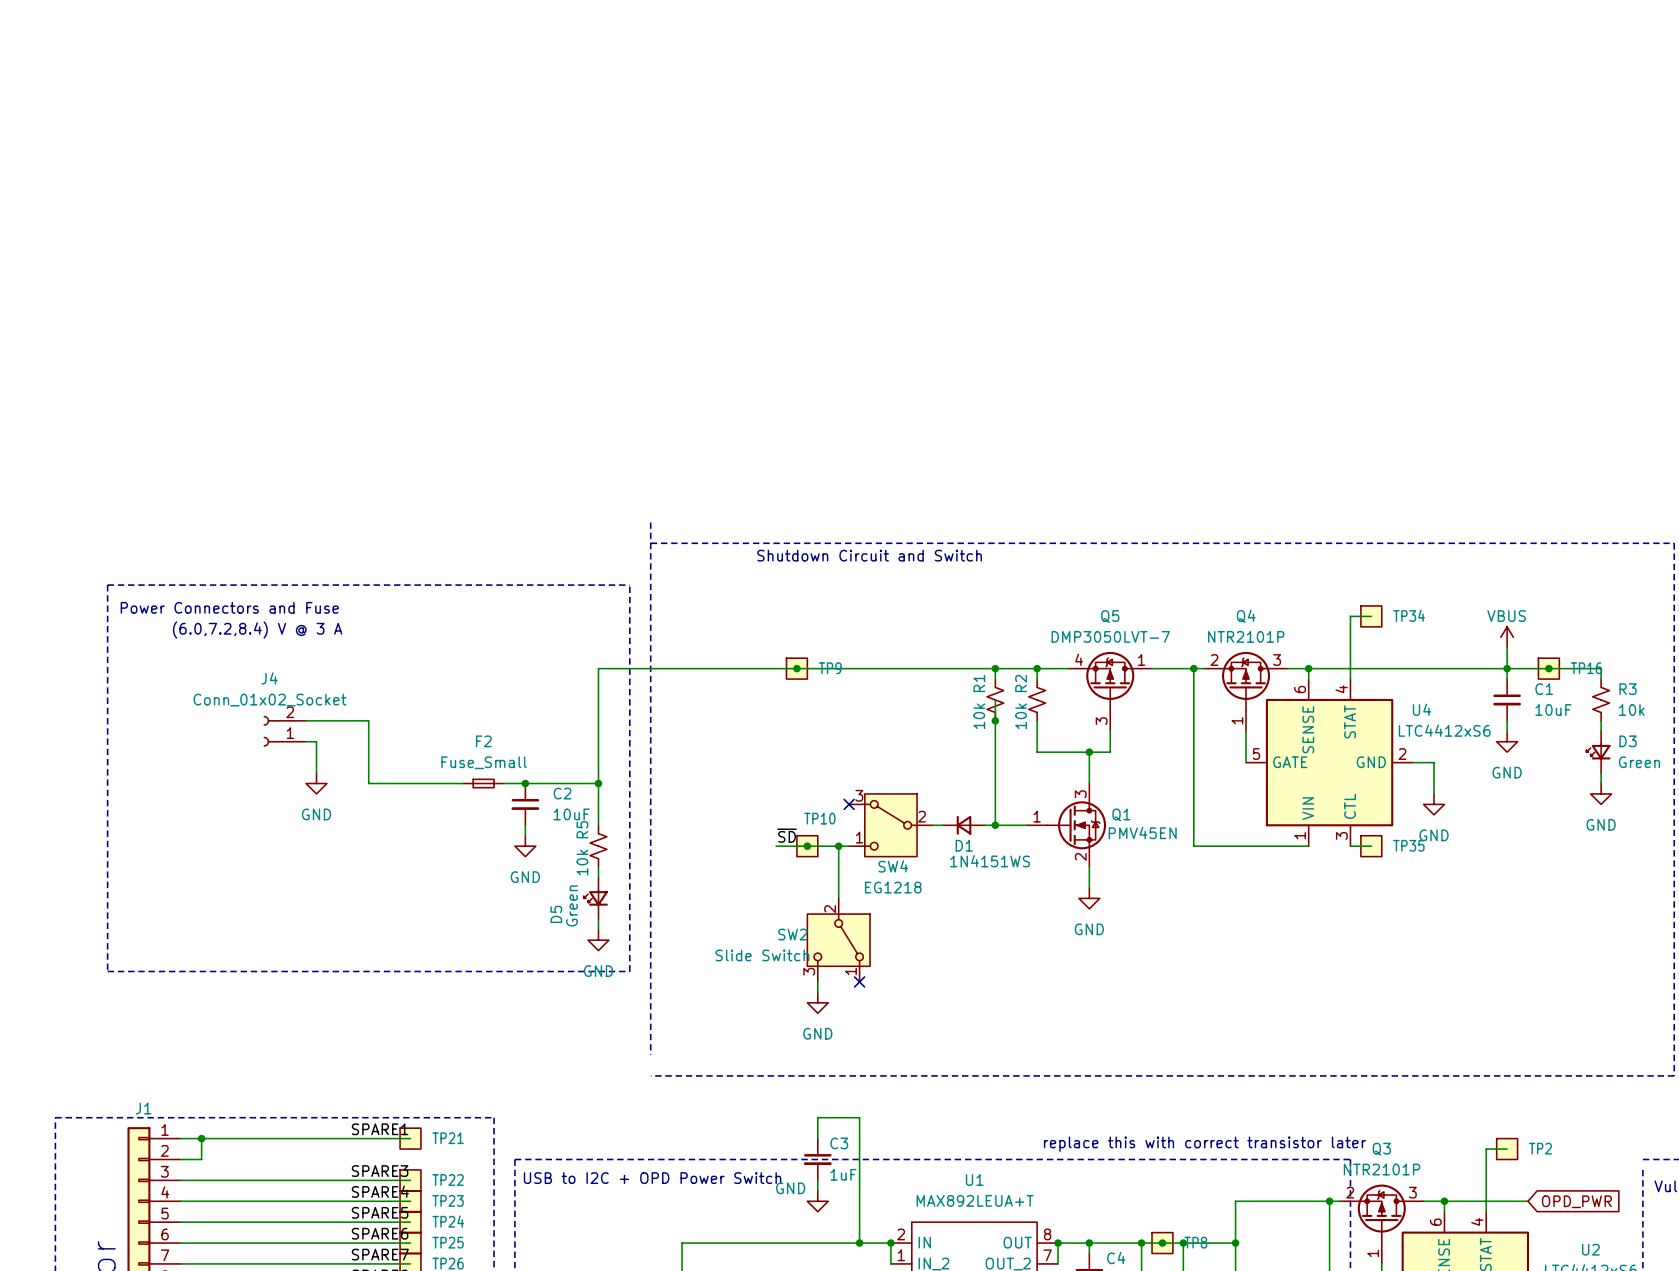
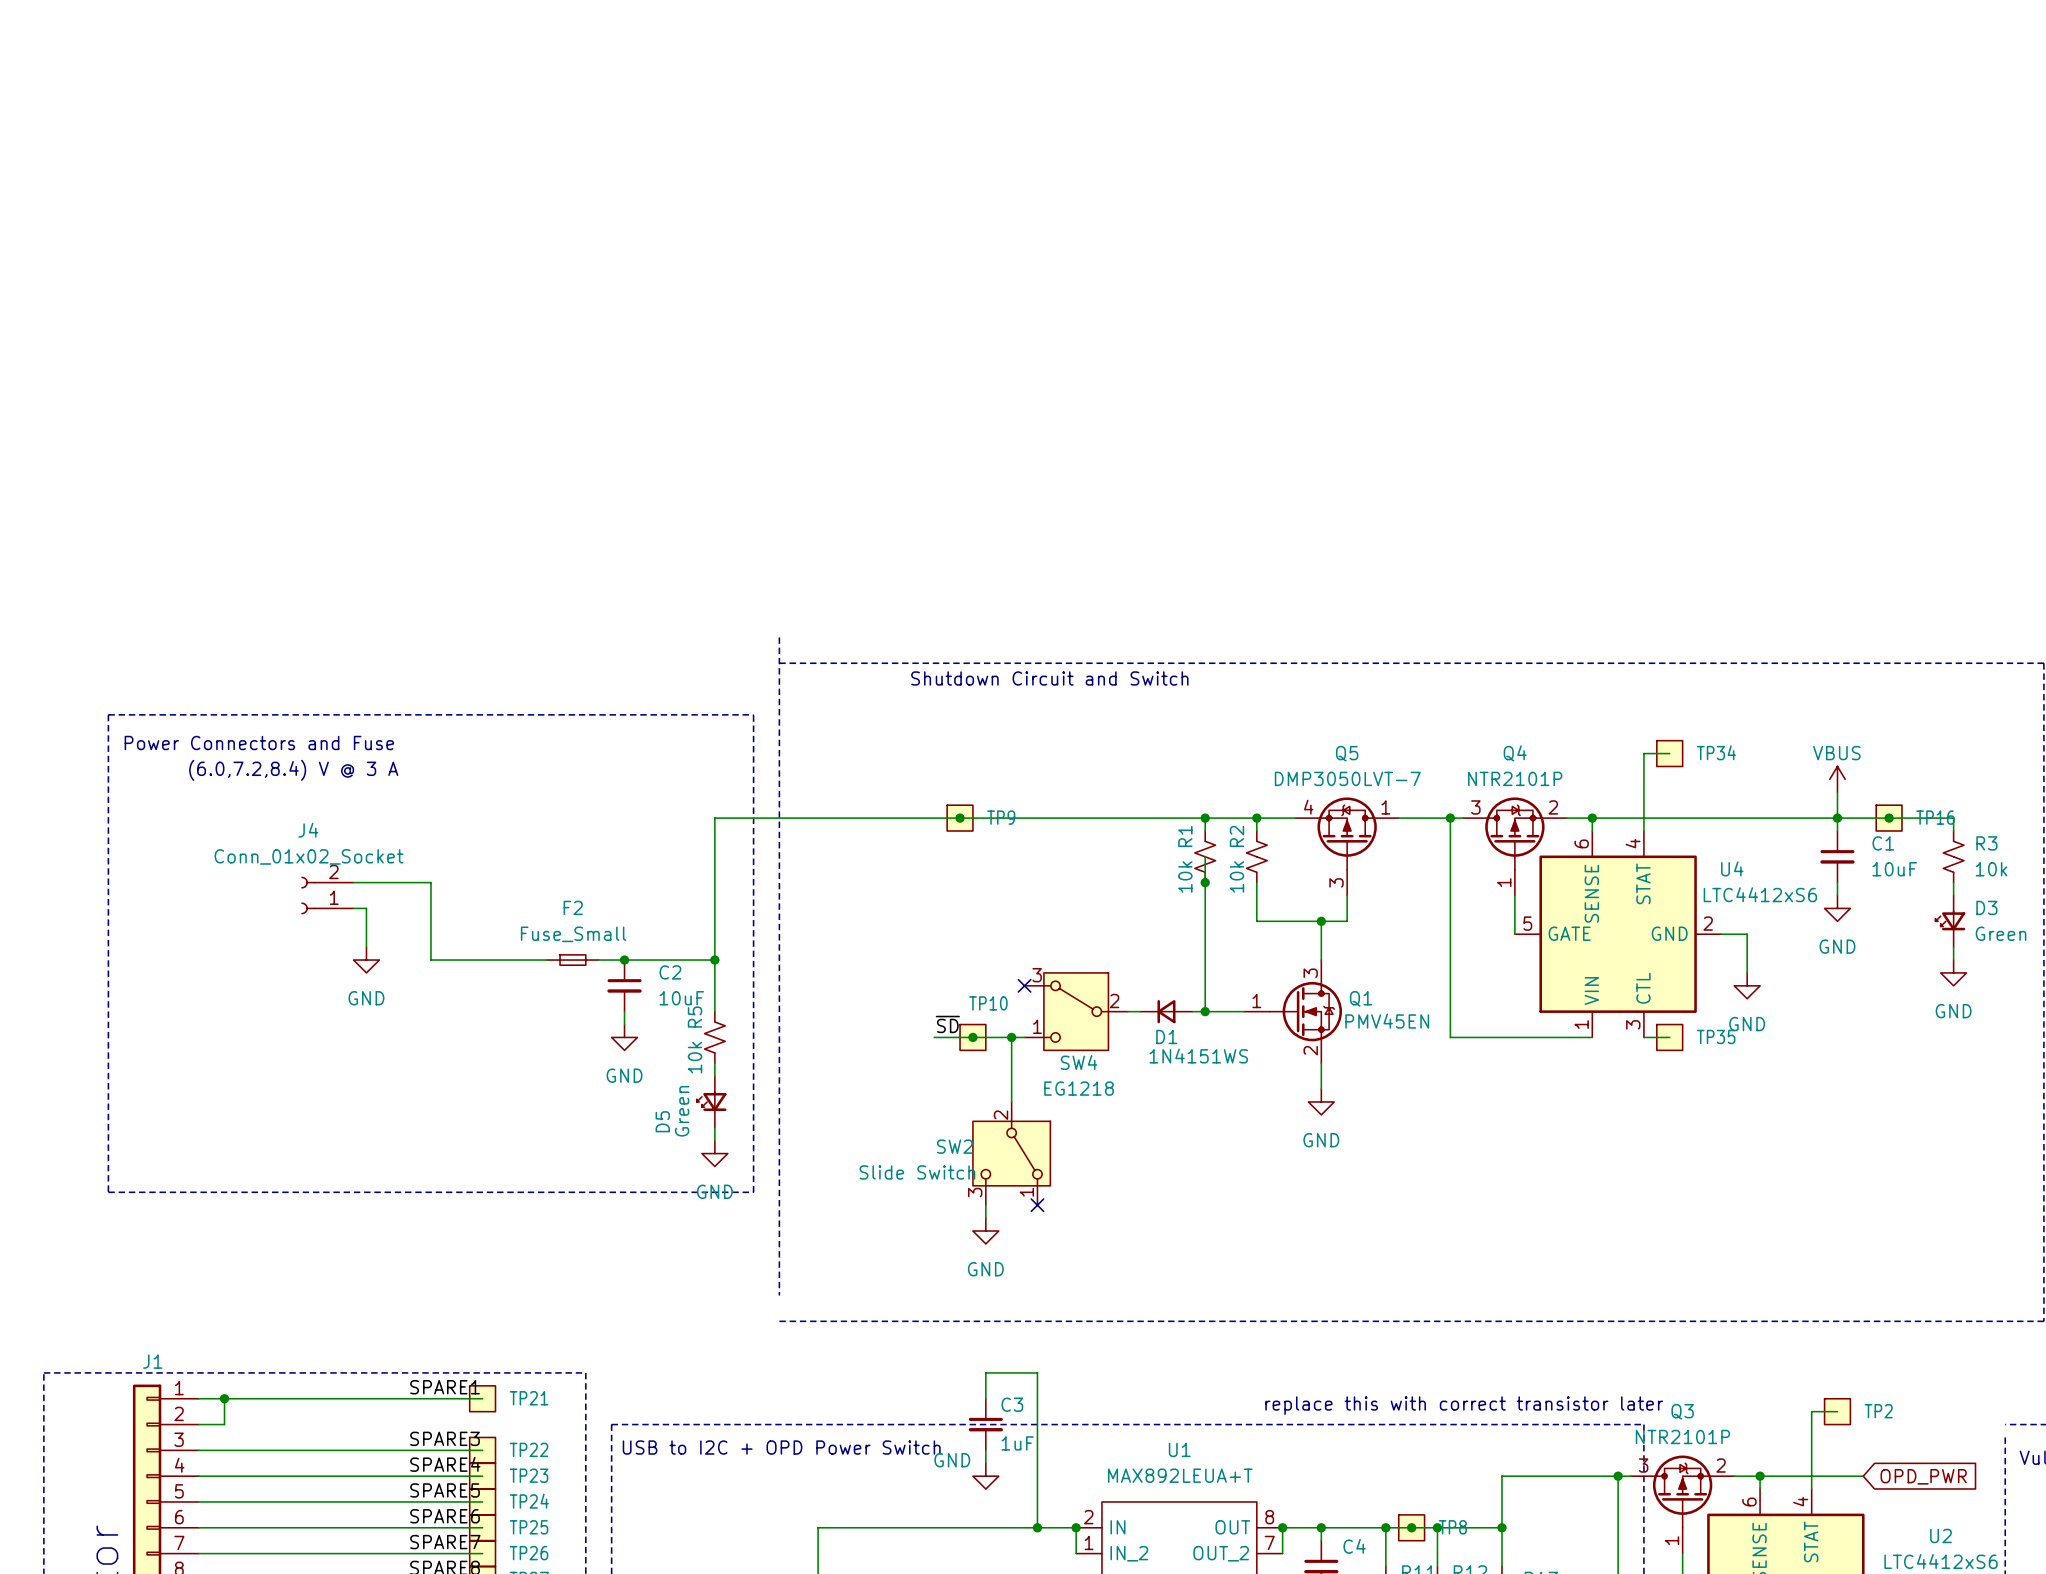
Q4 flip: as is (1246, 681) -> left-right (1514, 833)
Q3 flip: as is (1381, 1213) -> left-right (1682, 1491)

